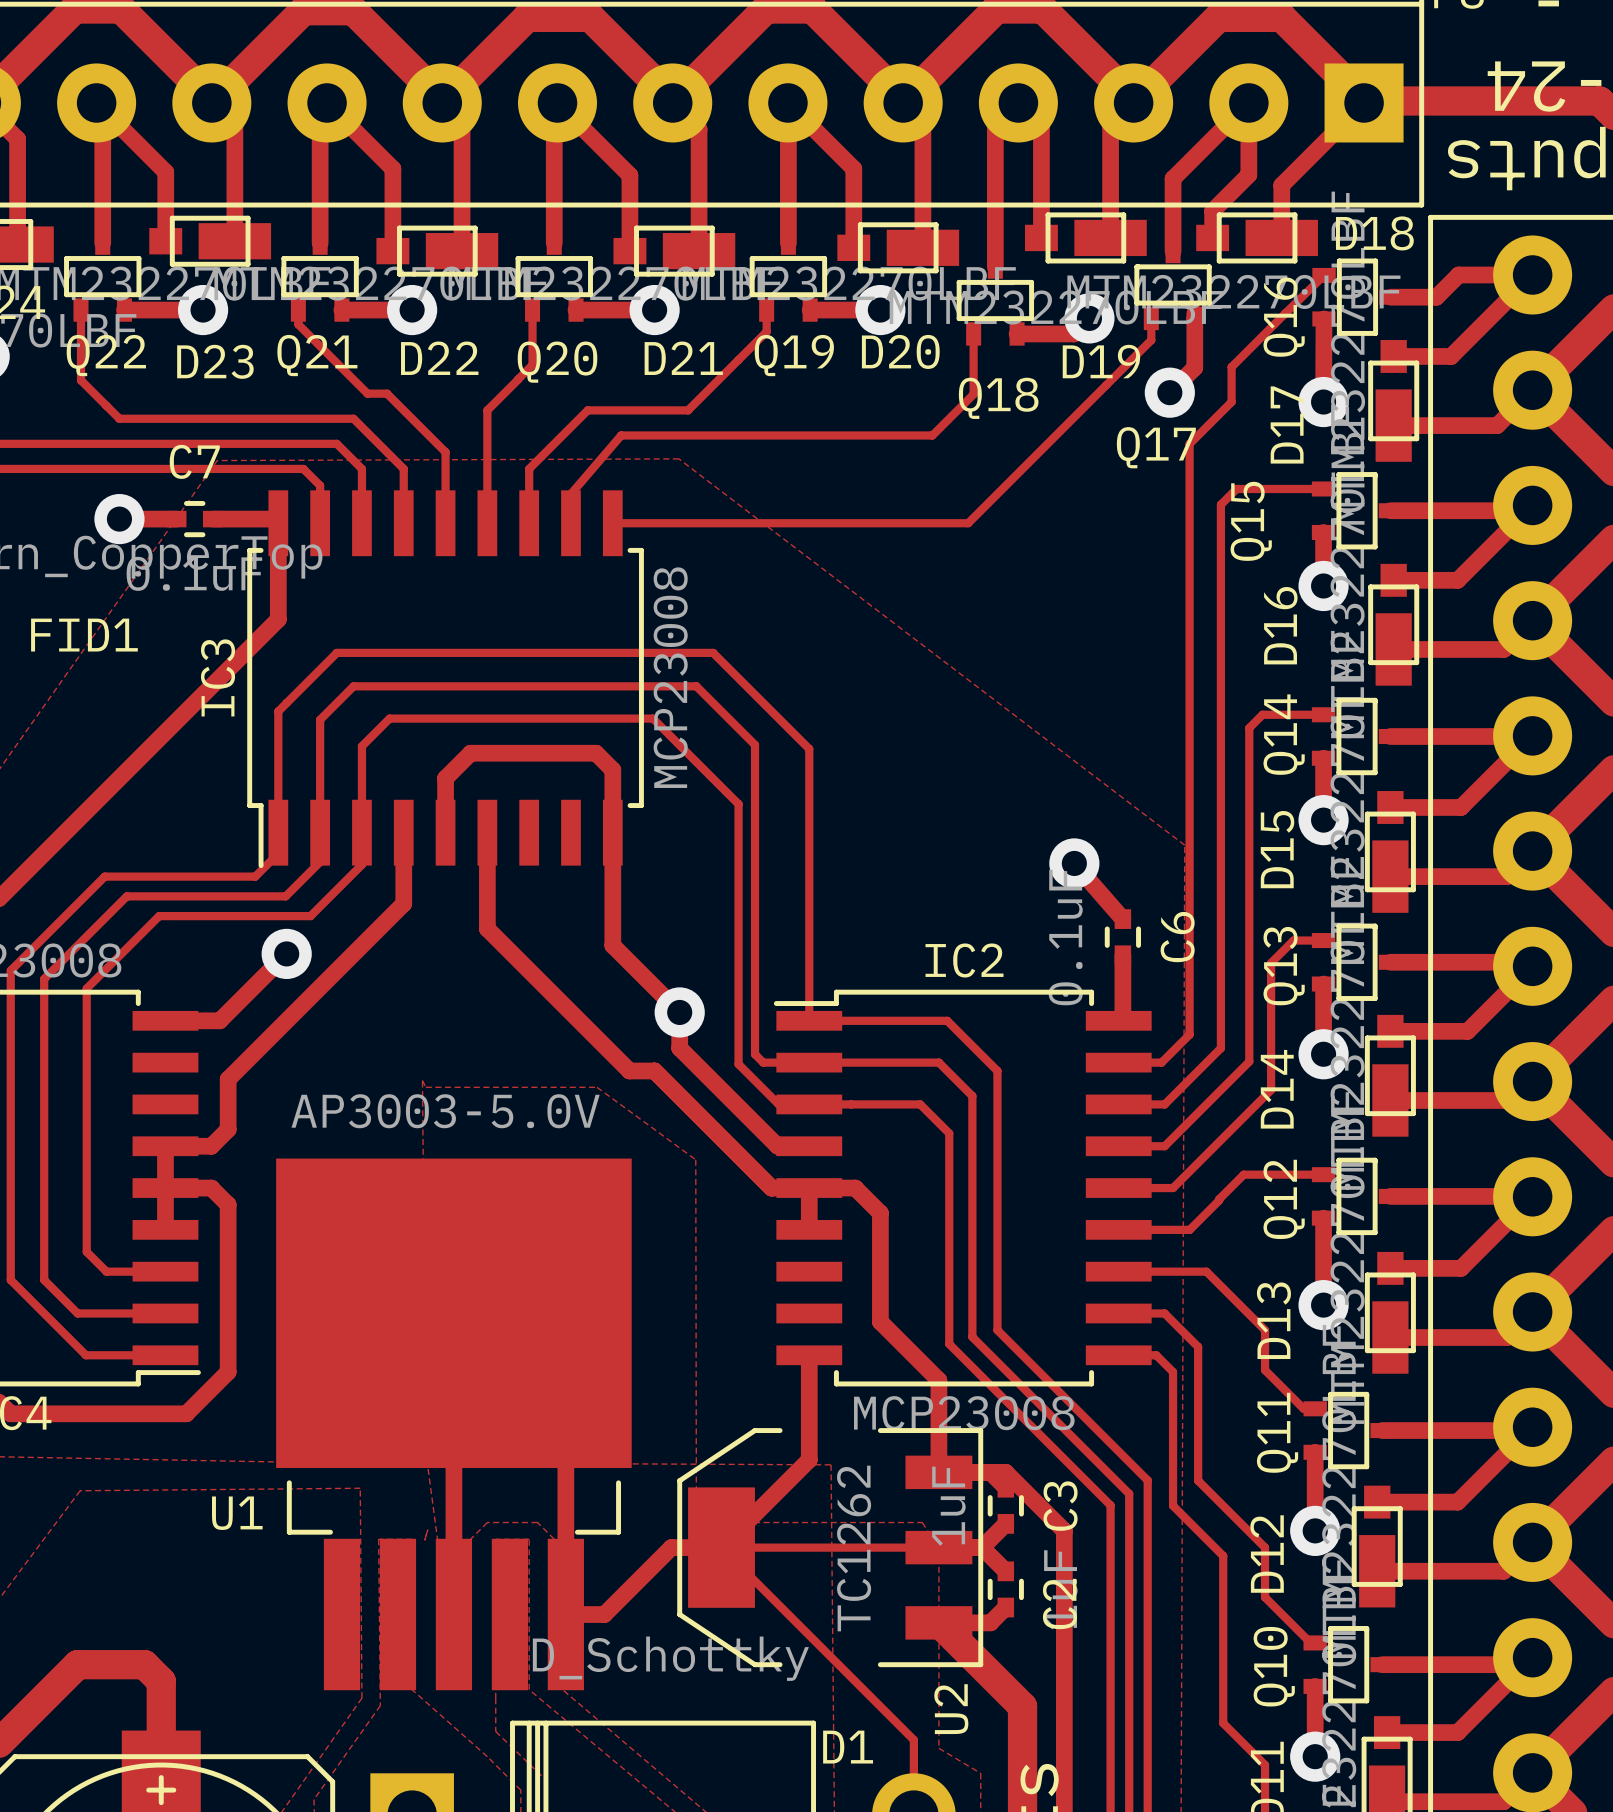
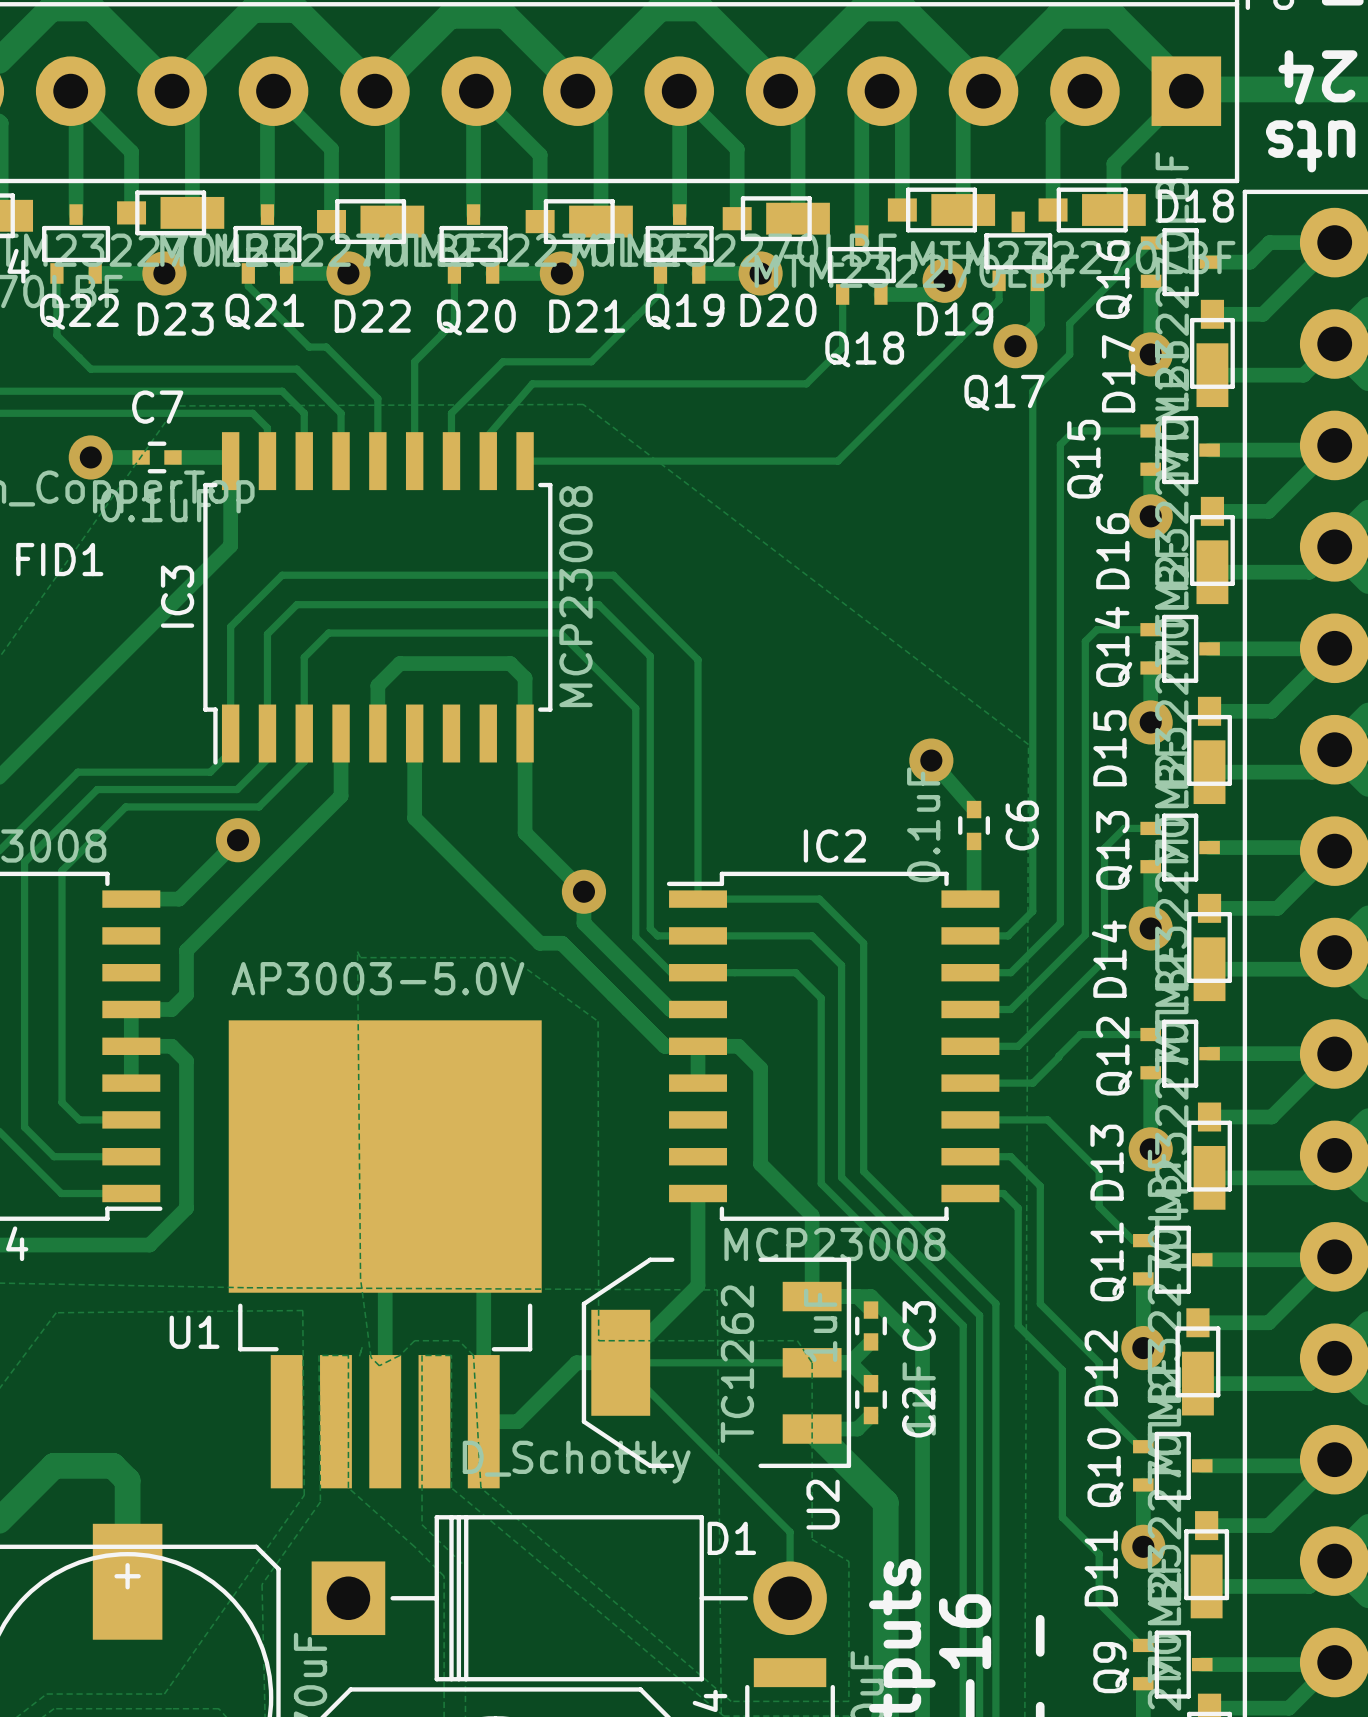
track: (1248, 102) (1248, 174) (1212, 211) -> (1053, 123) (1053, 186)
track: (1212, 139) (1173, 178) (1173, 251) -> none

